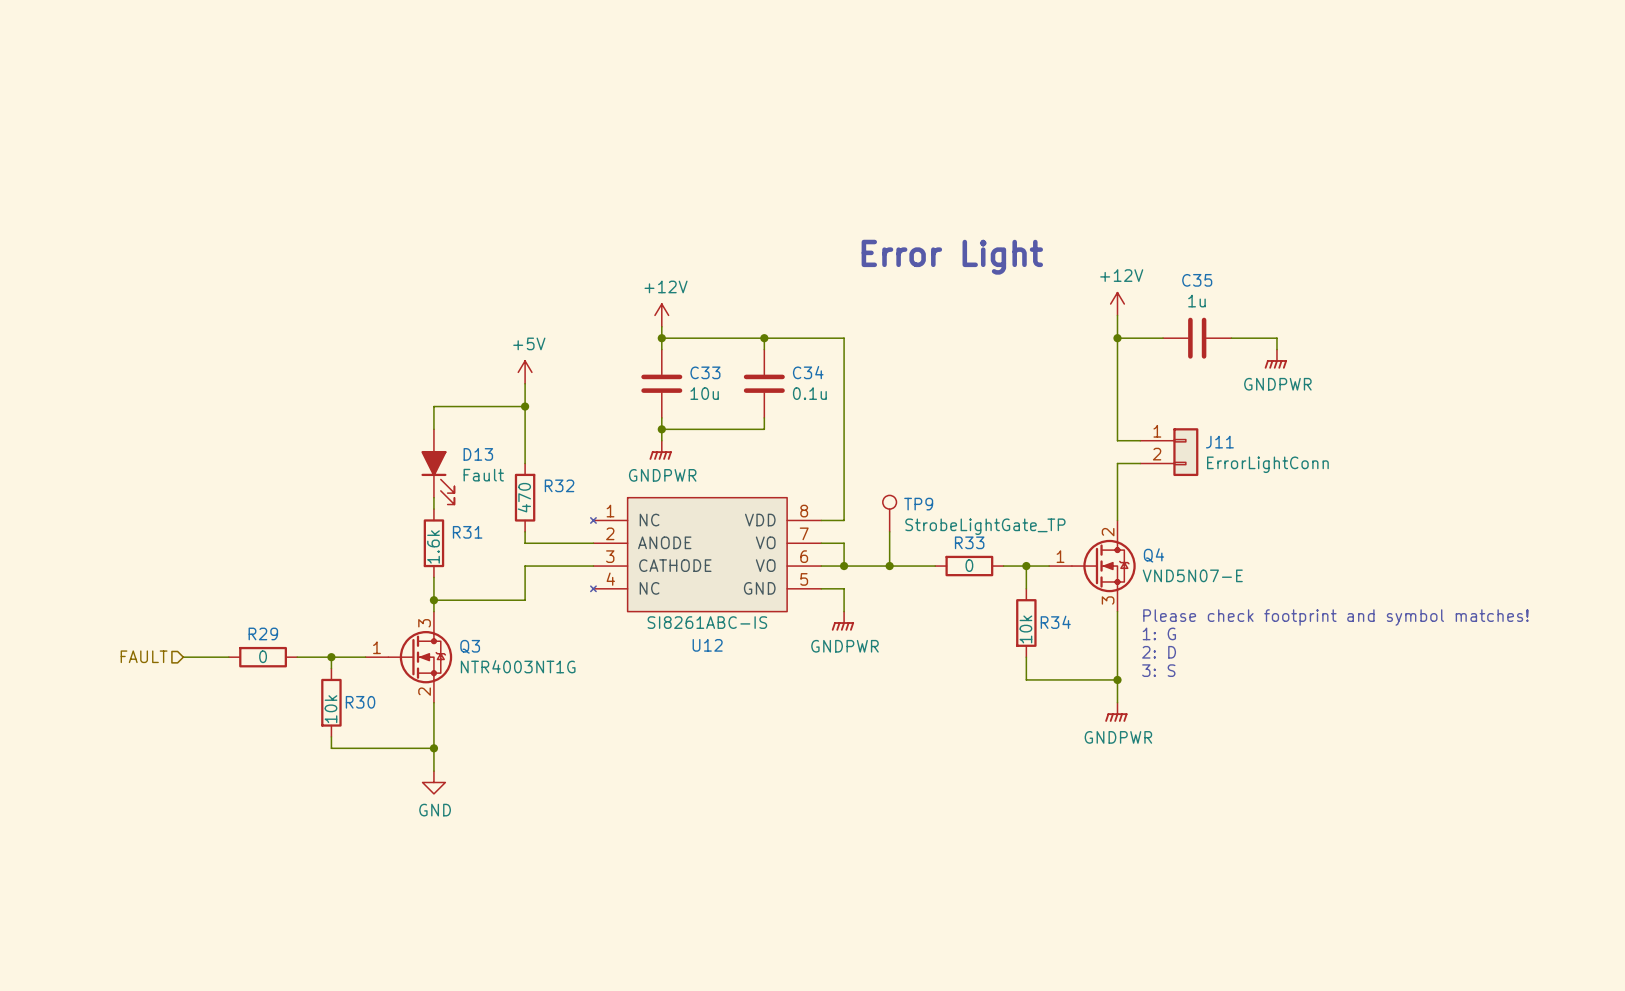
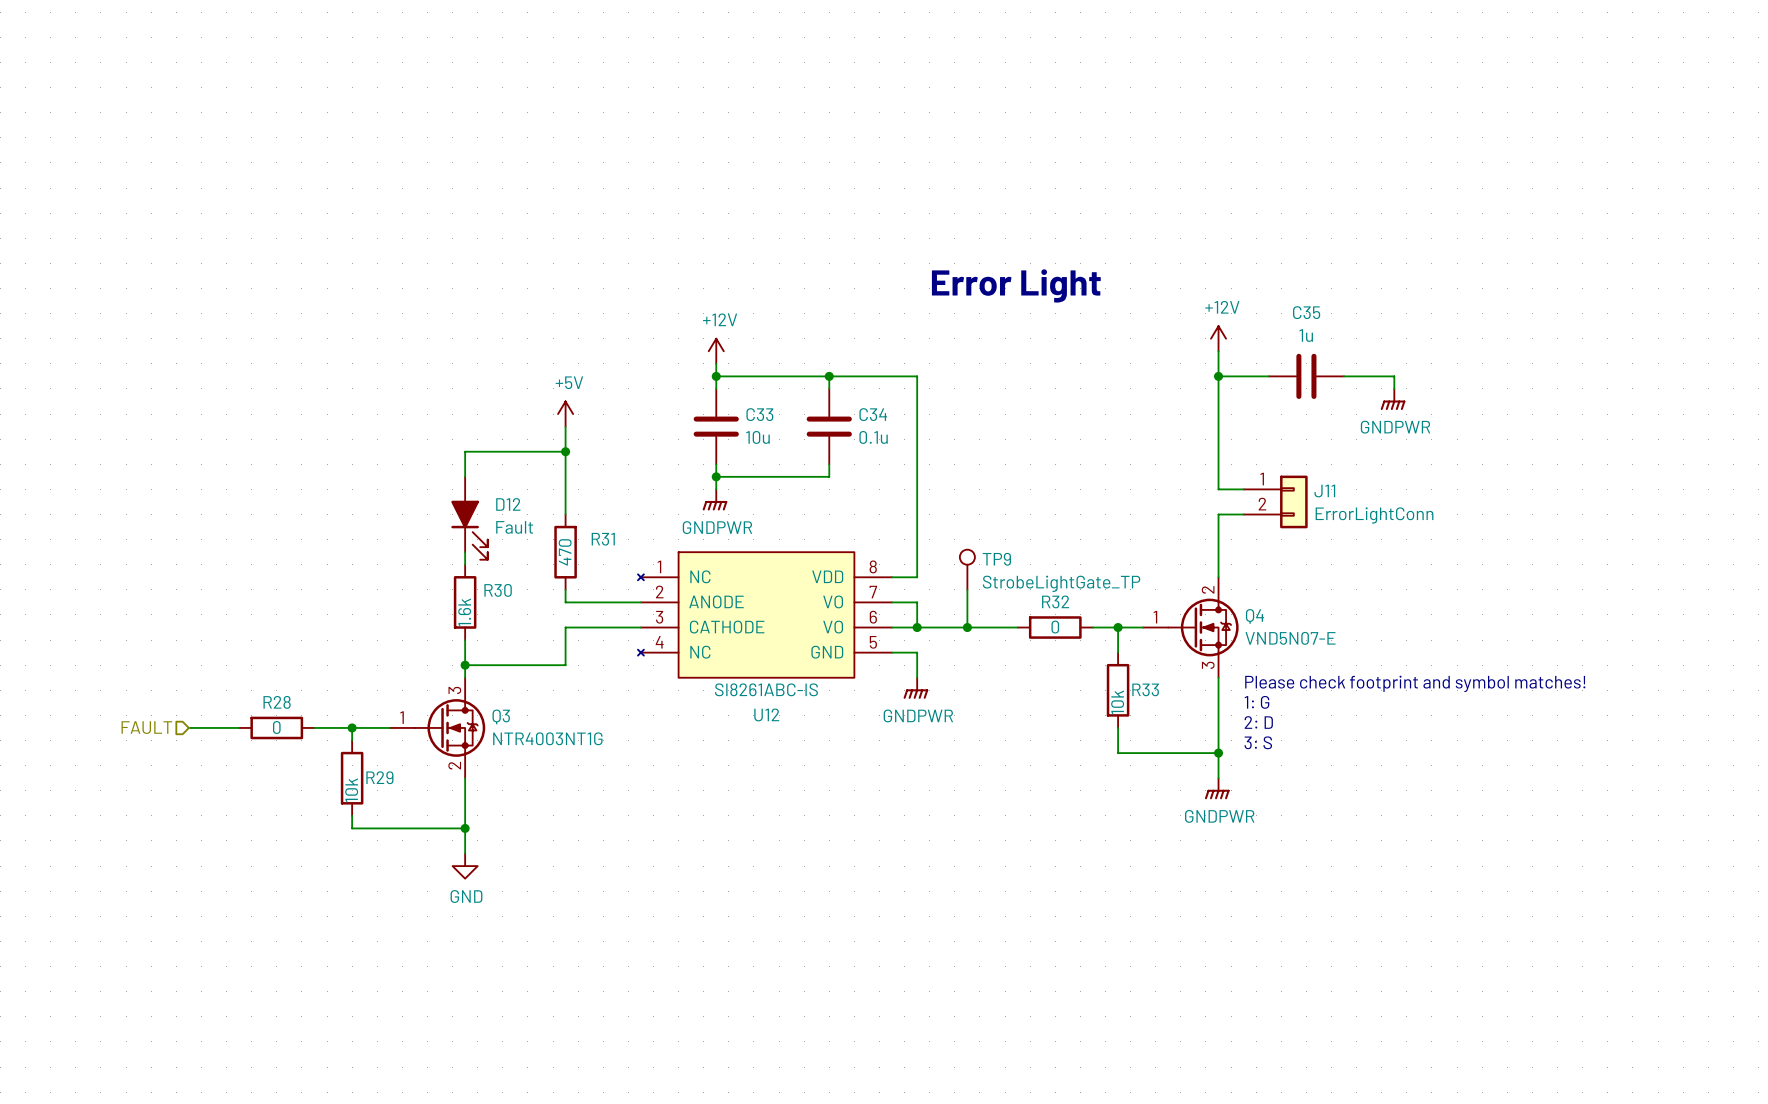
D13 name: D13 (478, 454) -> D12 (508, 504)
R32 name: R32 (559, 485) -> R31 (603, 539)
R31 name: R31 (467, 532) -> R30 (498, 590)
R33 name: R33 (969, 542) -> R32 (1055, 601)
R34 name: R34 (1055, 622) -> R33 (1145, 689)
R29 name: R29 (263, 633) -> R28 (277, 702)
R30 name: R30 (360, 702) -> R29 (379, 777)

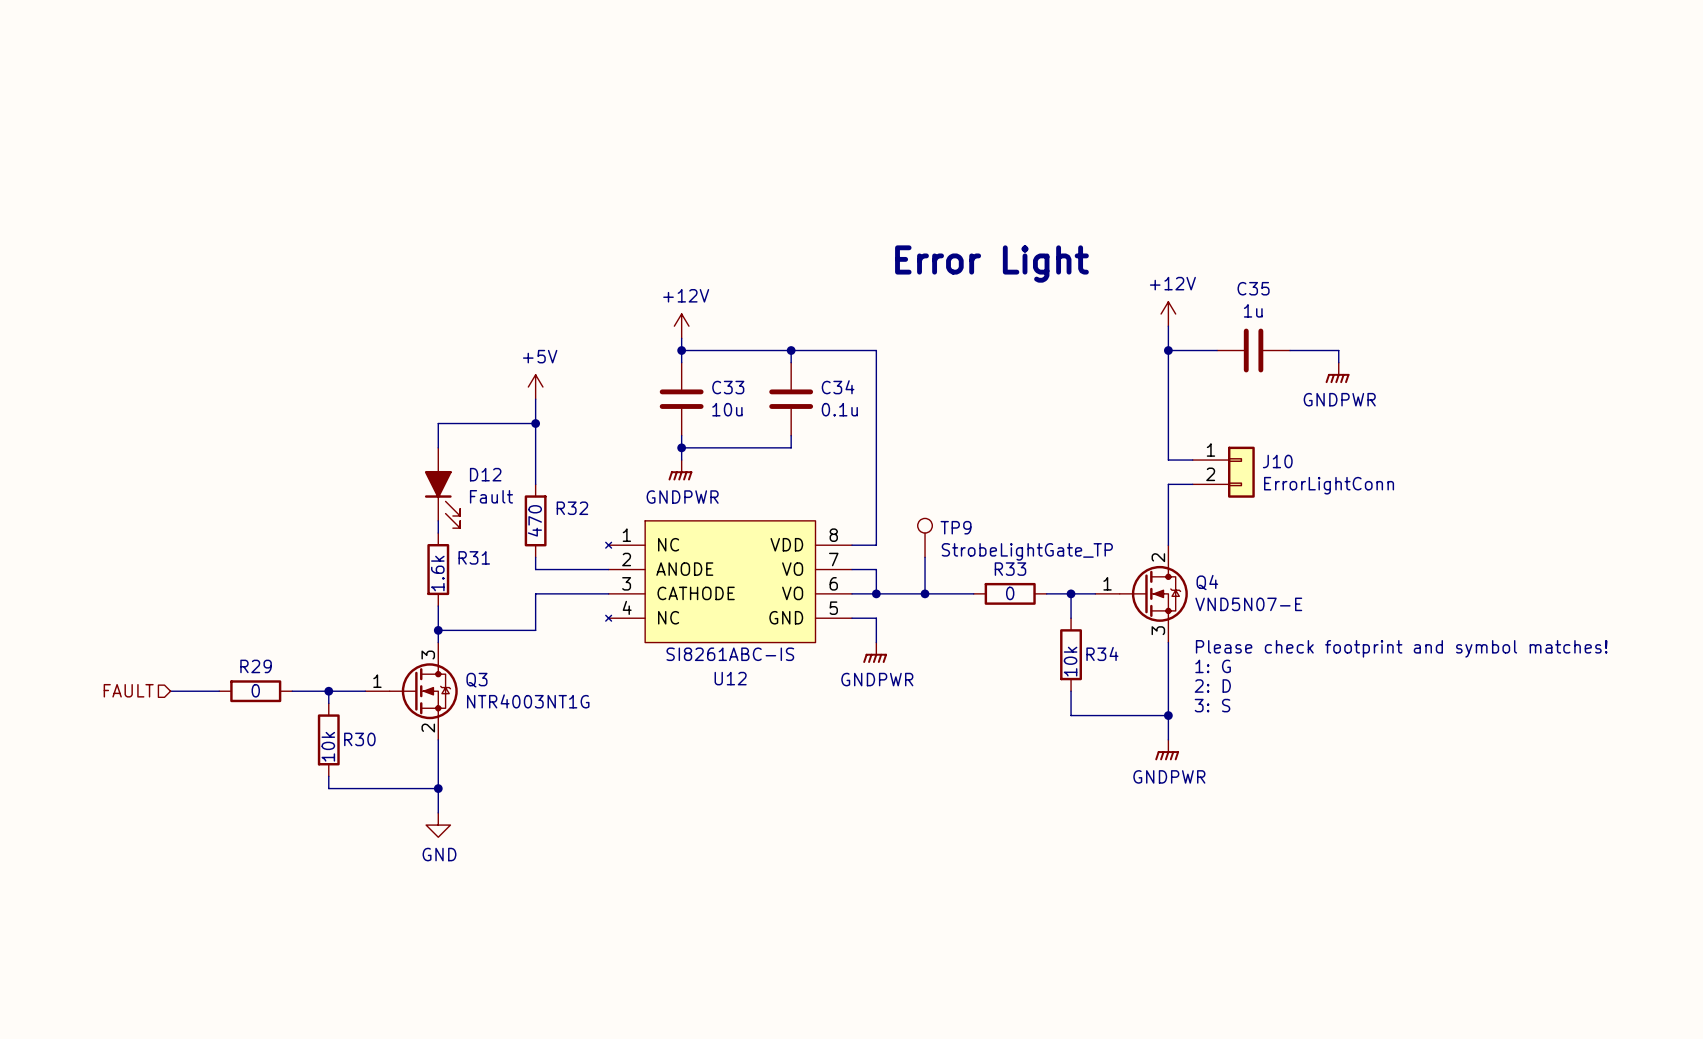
J11 name: J11 (1324, 491) -> J10 (1277, 461)
R31 name: R31 (603, 539) -> R32 (572, 508)
R30 name: R30 (498, 590) -> R31 (474, 557)
R32 name: R32 (1055, 601) -> R33 (1010, 569)
R33 name: R33 (1145, 689) -> R34 (1102, 653)
R28 name: R28 (277, 702) -> R29 (256, 666)
R29 name: R29 (379, 777) -> R30 (359, 739)

